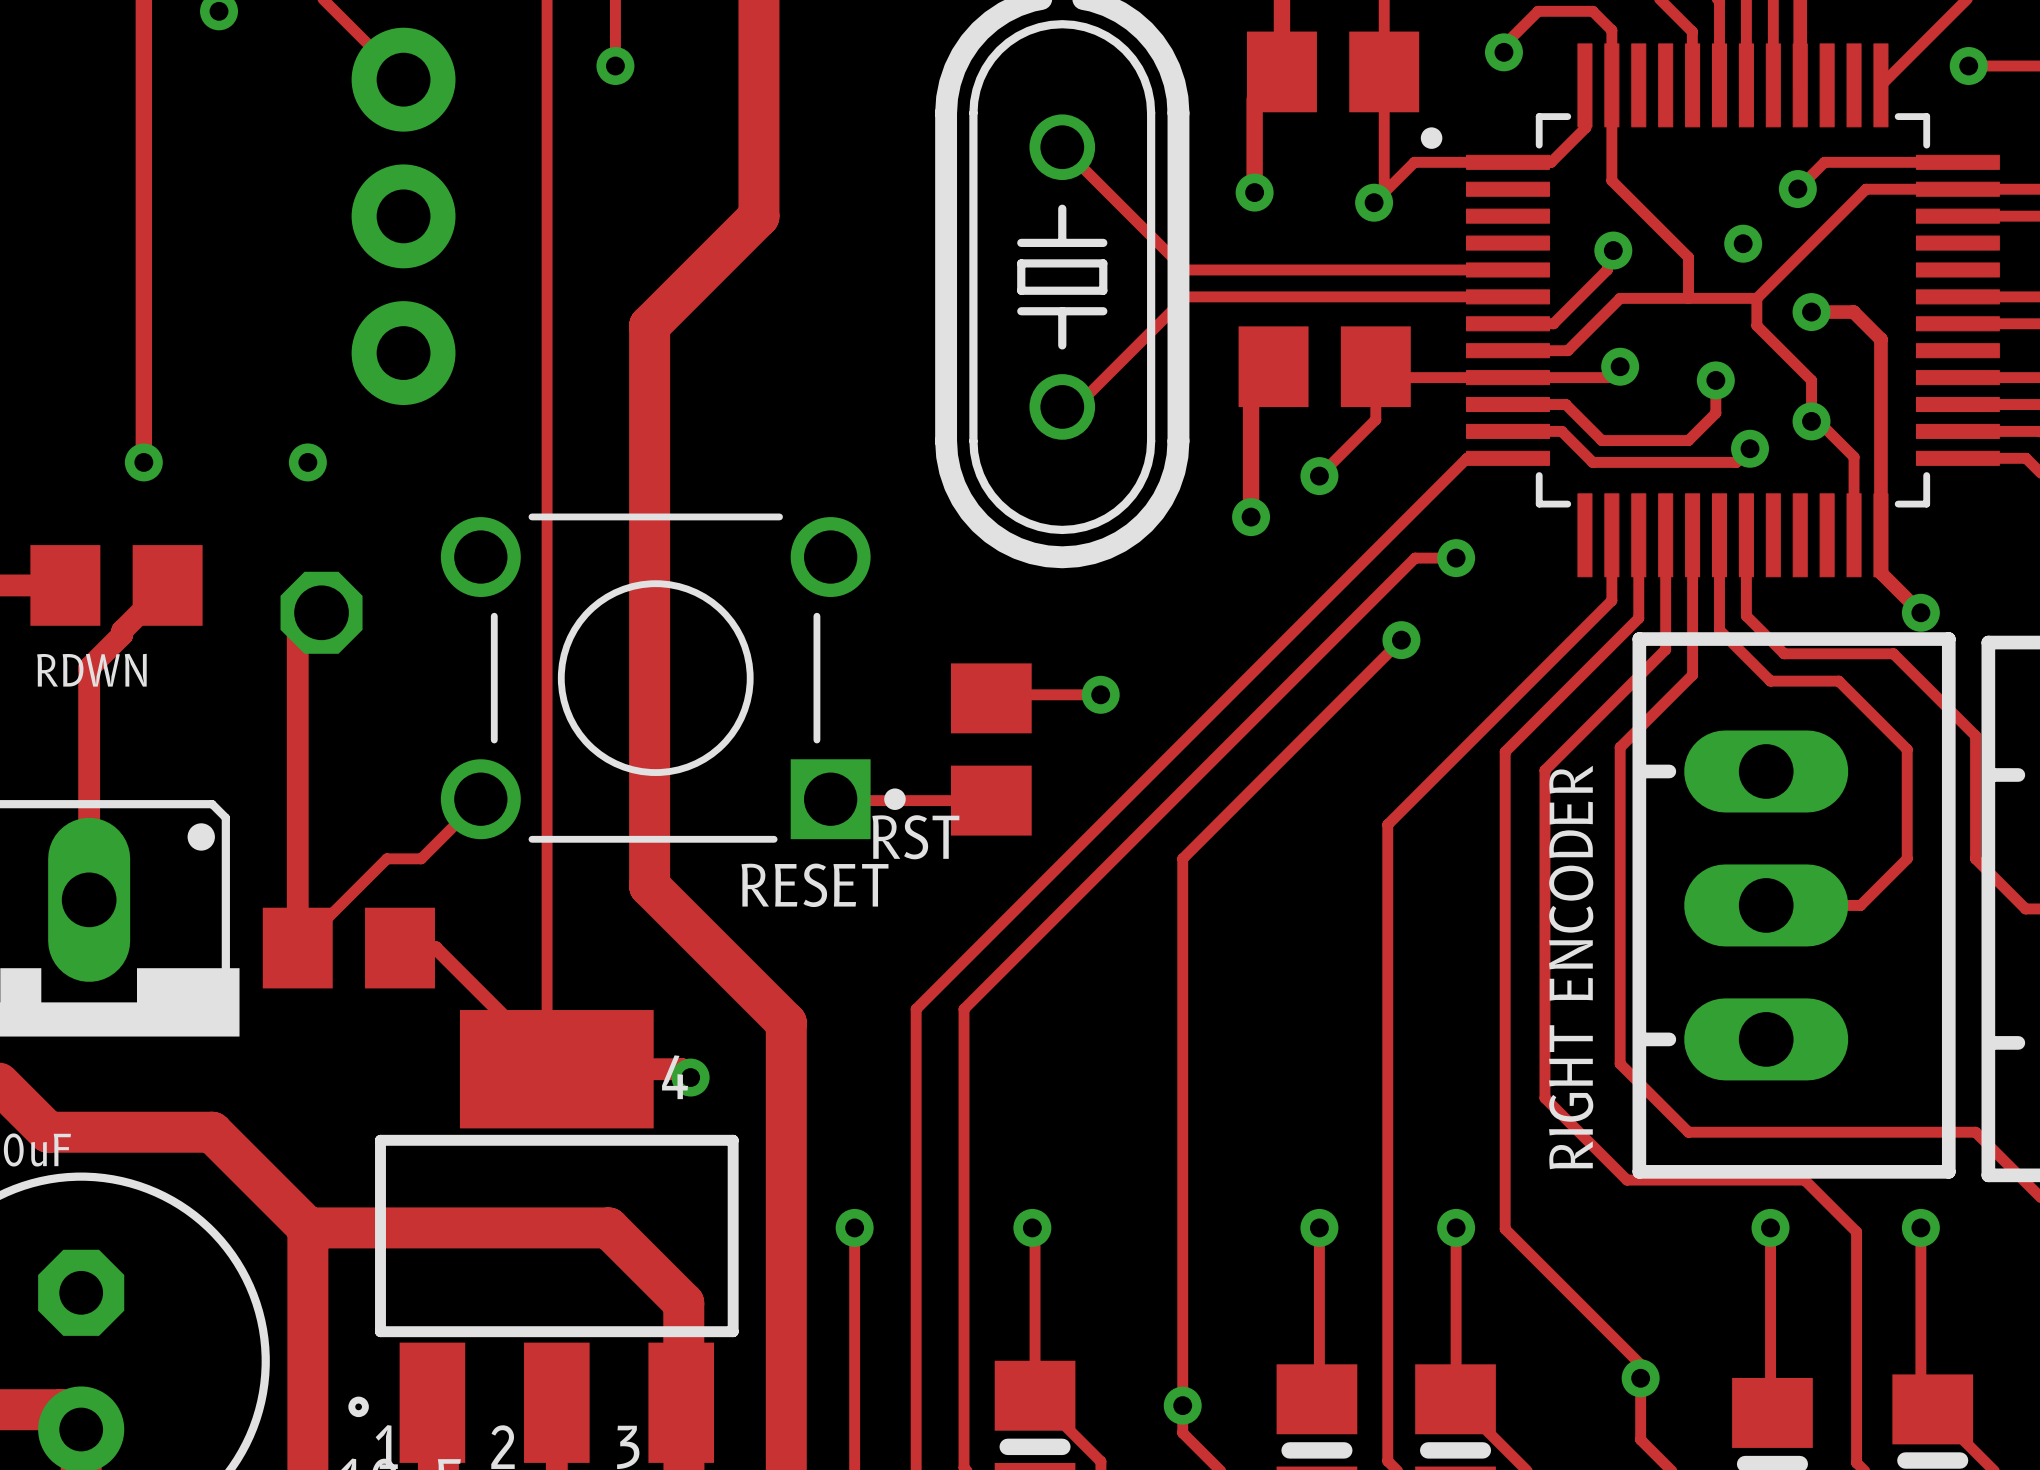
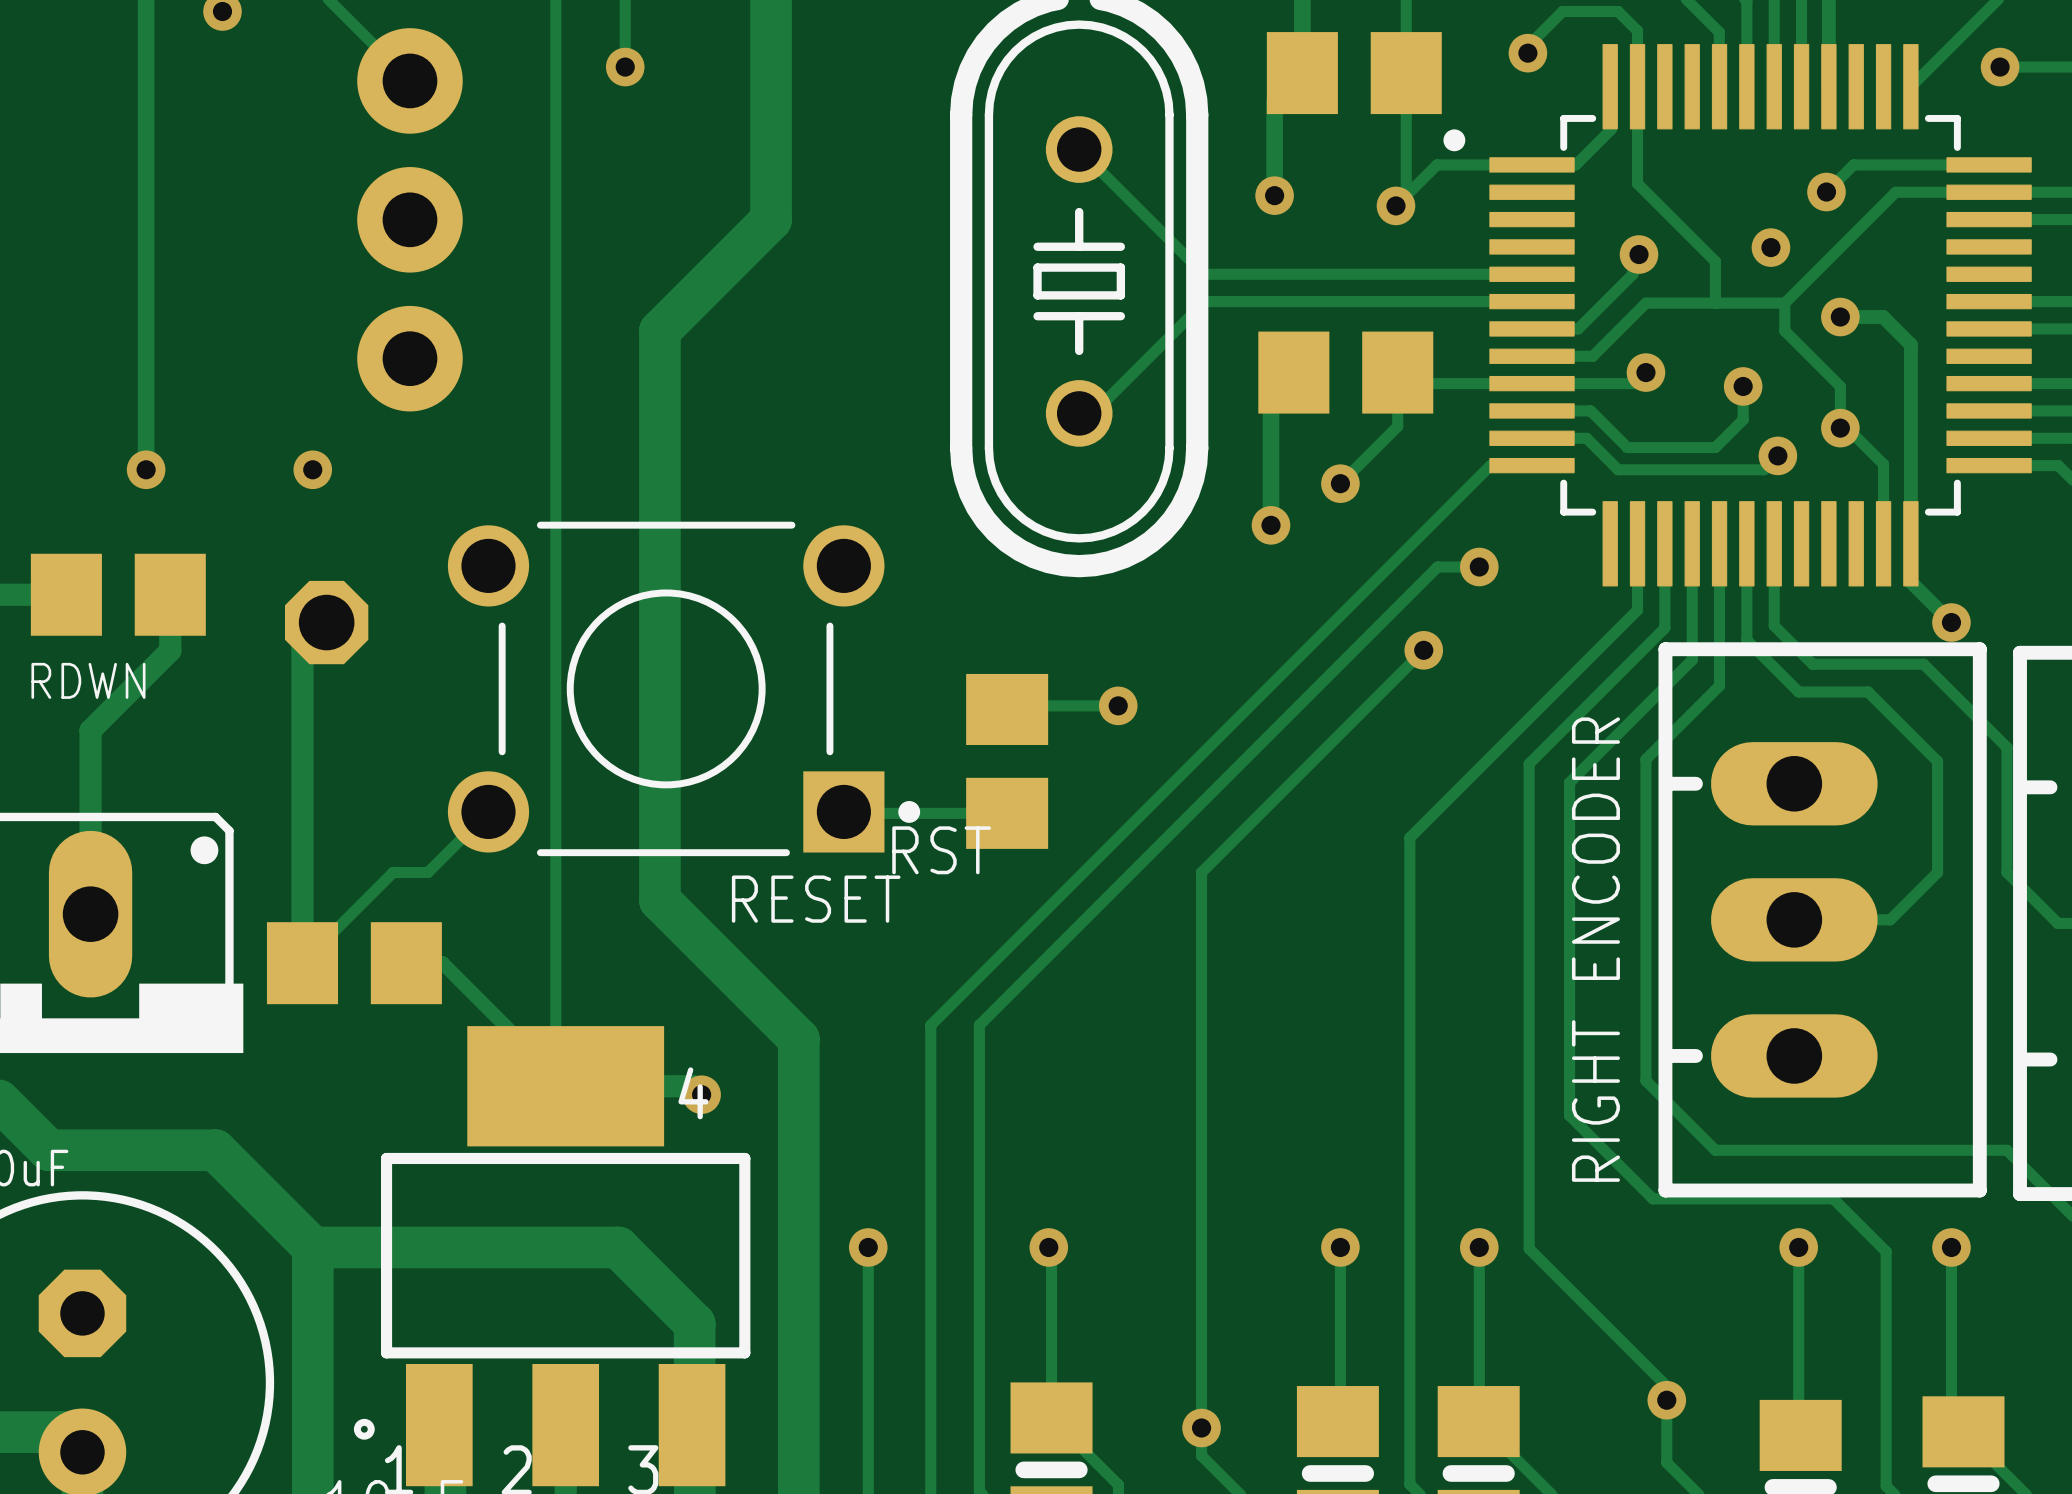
track: (167, 585) (122, 630) (122, 634) (89, 667) (89, 719) -> (170, 594) (170, 650) (90, 730)

